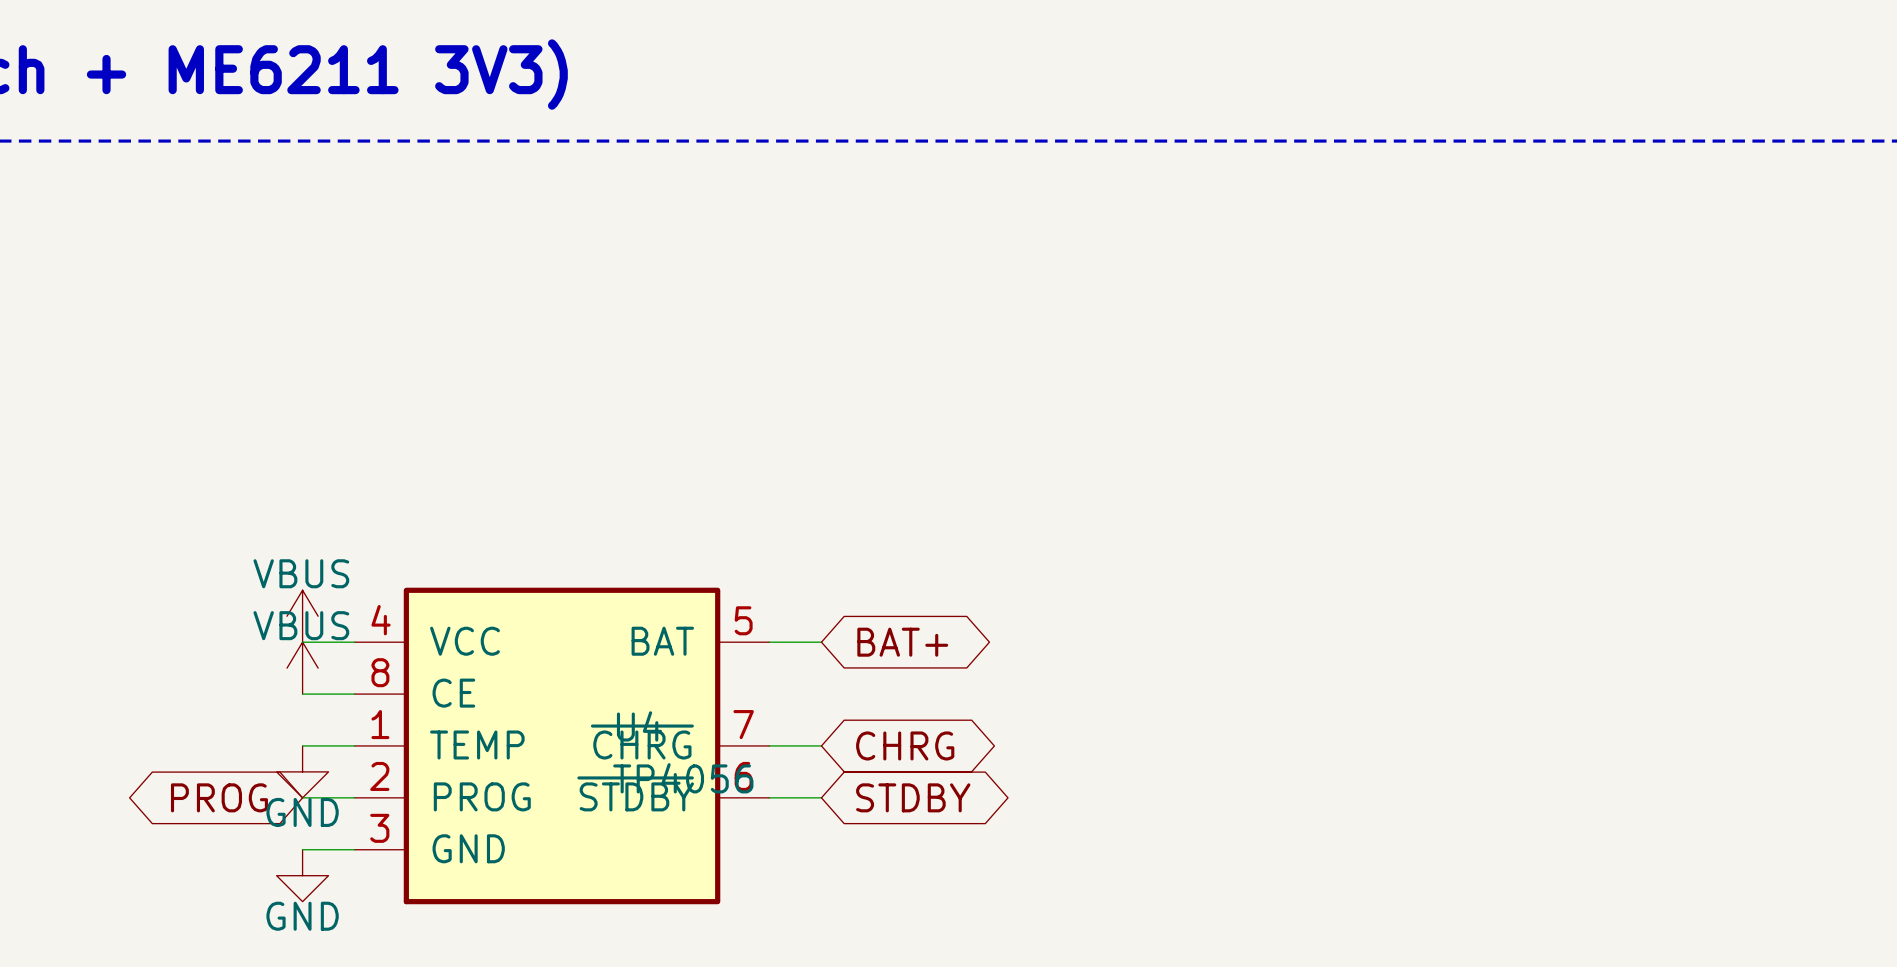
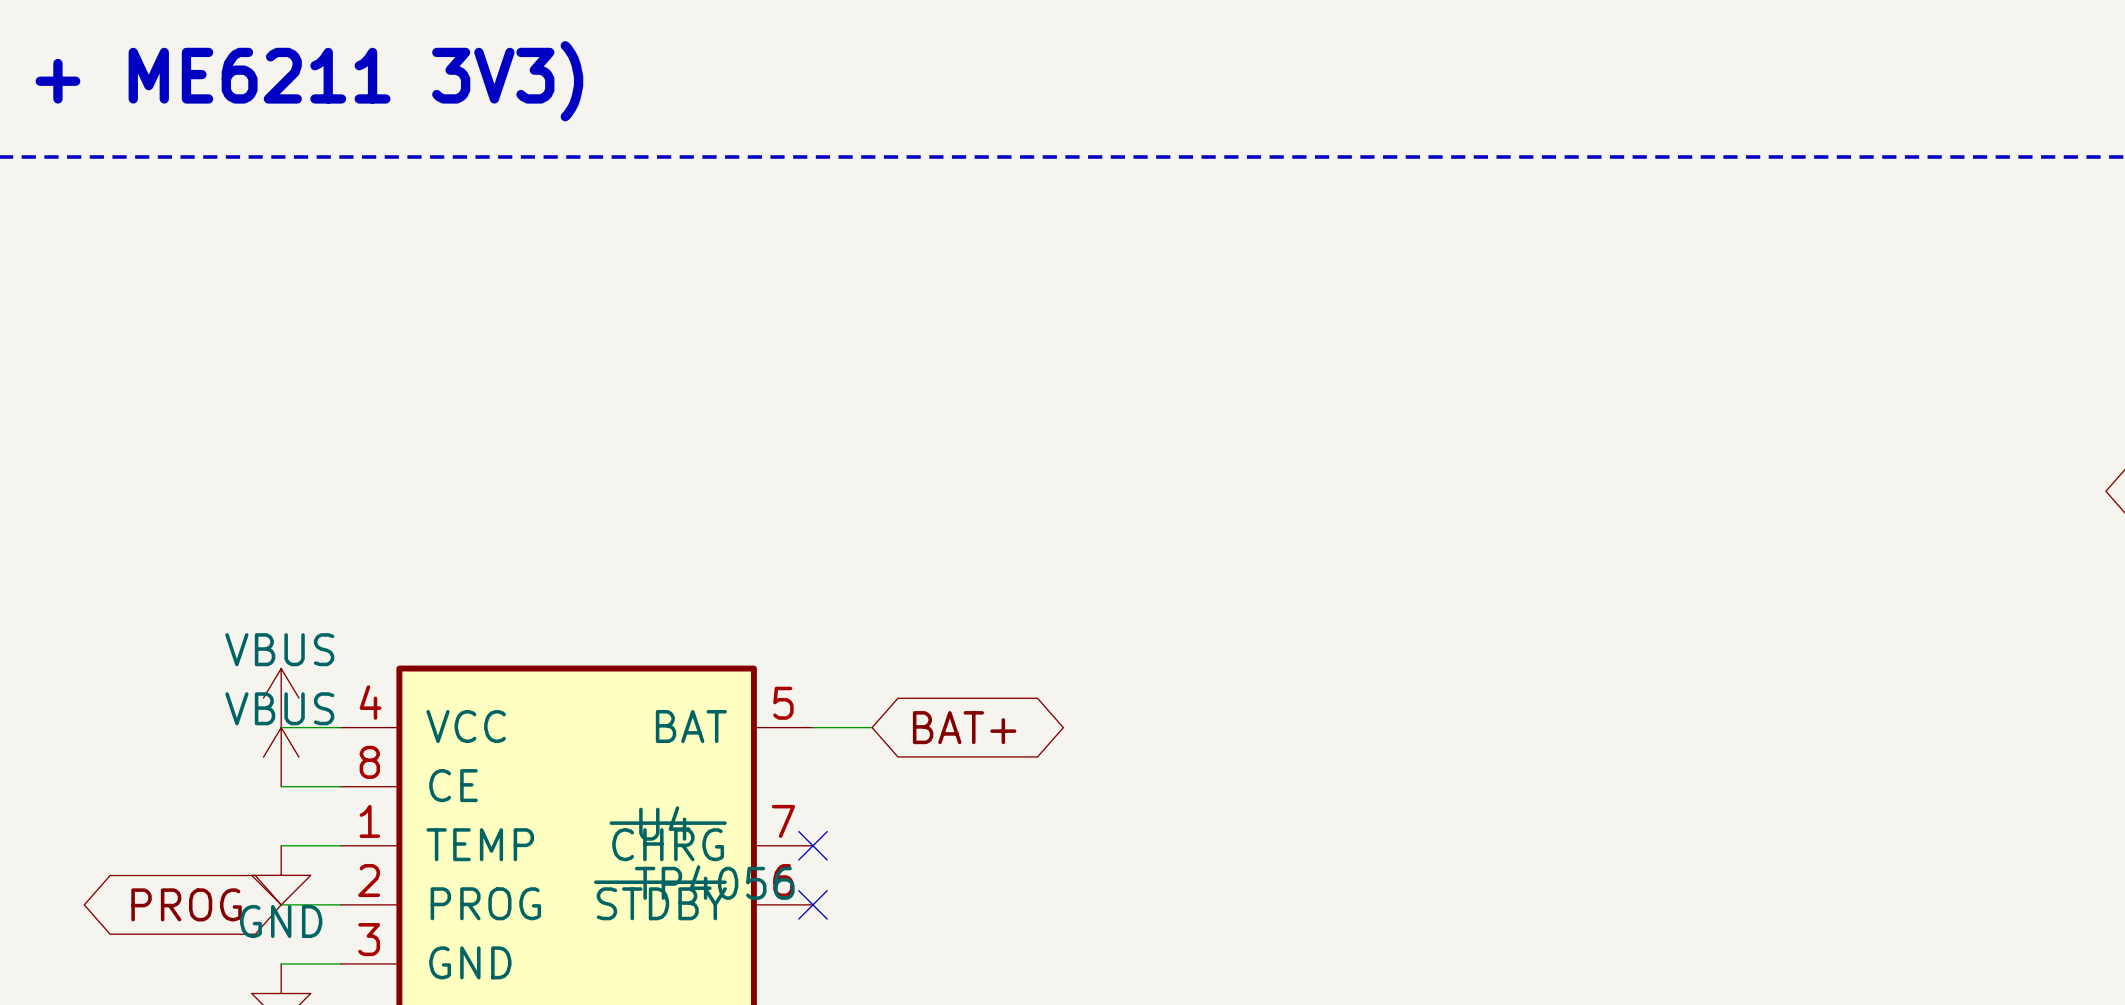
wire: (769, 745) (821, 745) -> none
no-connect mark: none -> (812, 845)
global label: CHRG (905, 745) -> none
wire: (769, 797) (821, 797) -> none
no-connect mark: none -> (812, 904)
global label: STDBY (913, 797) -> none

